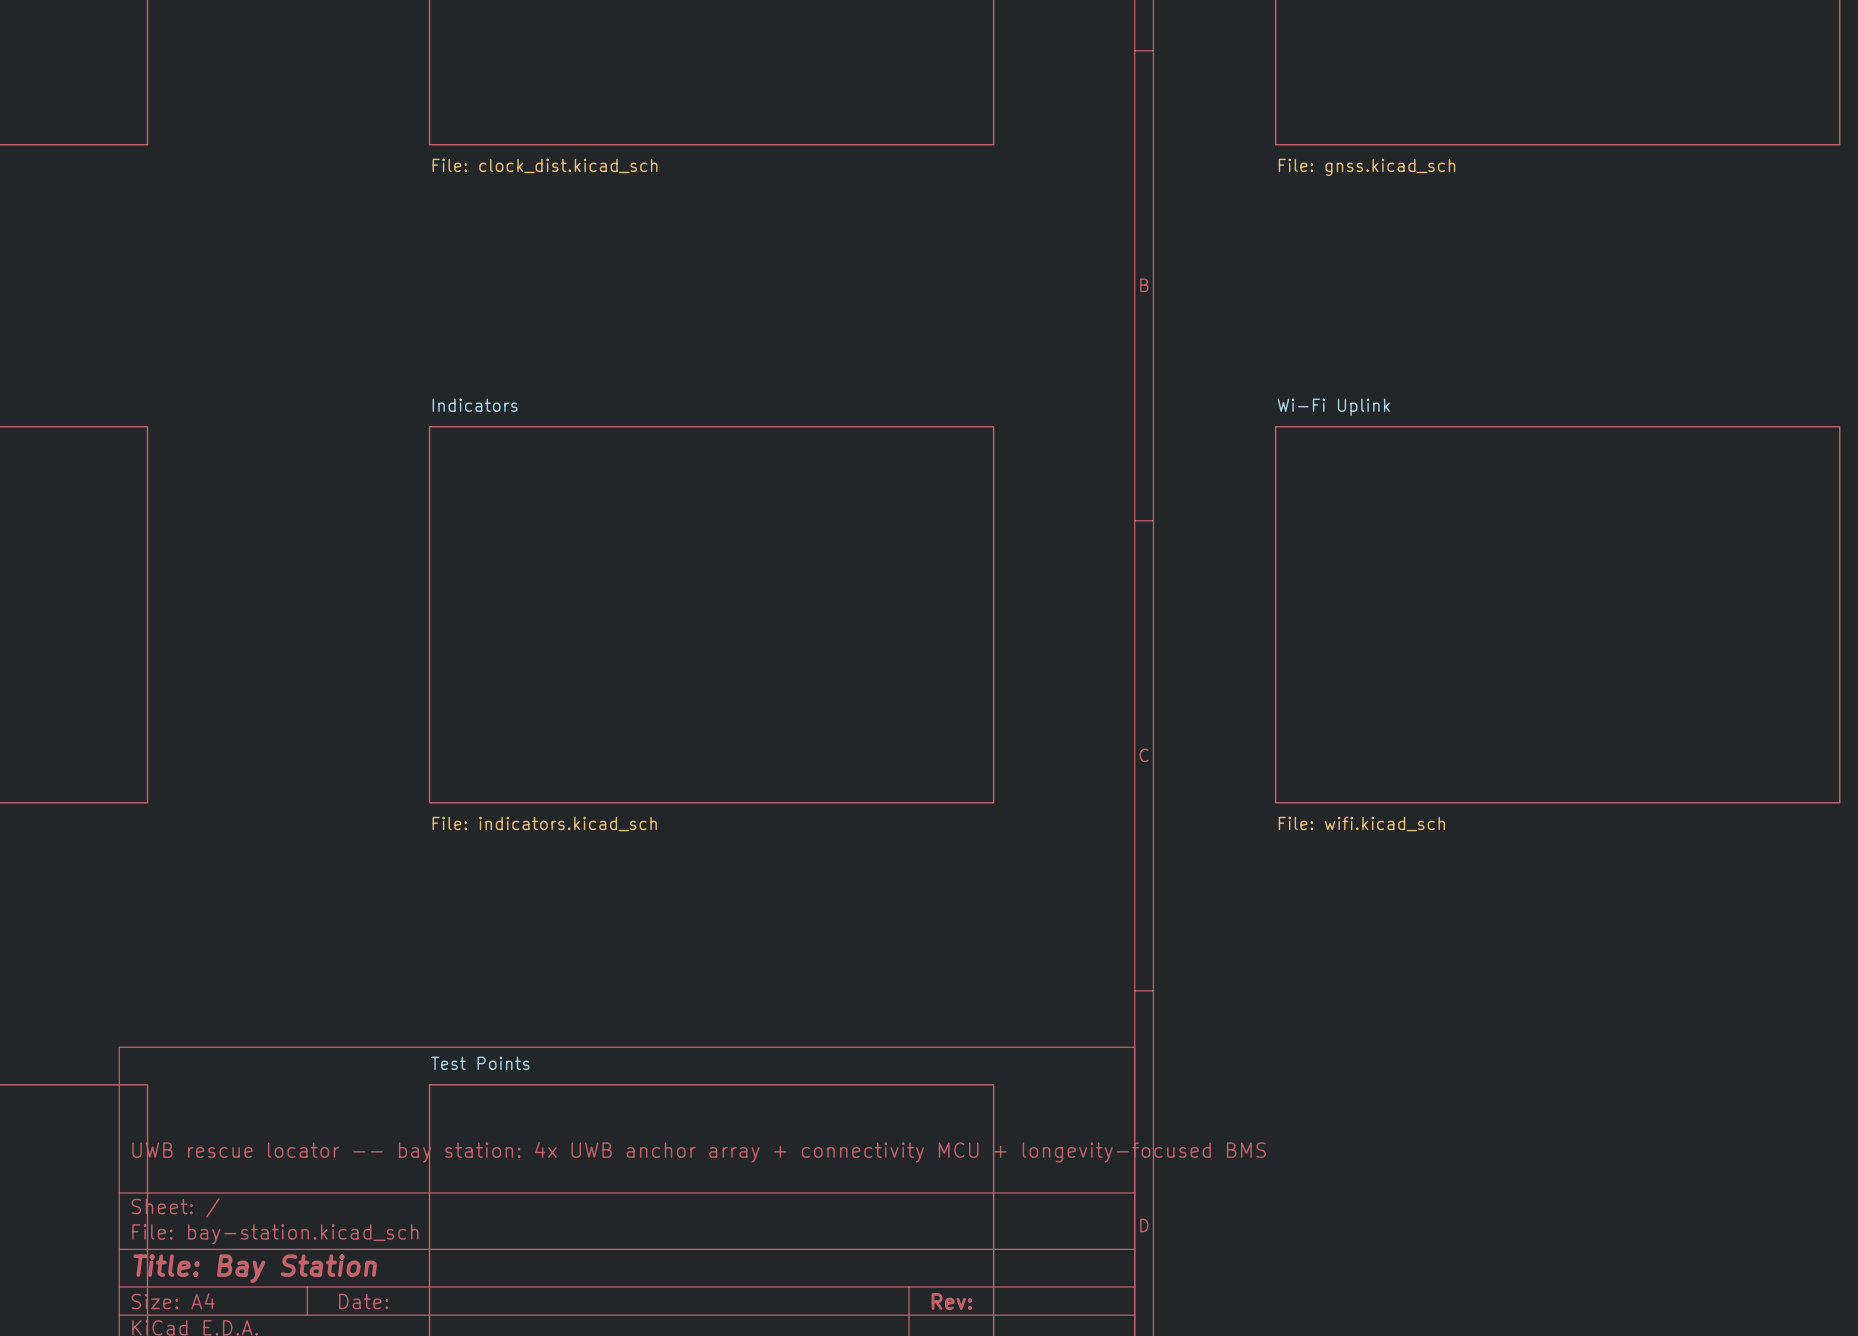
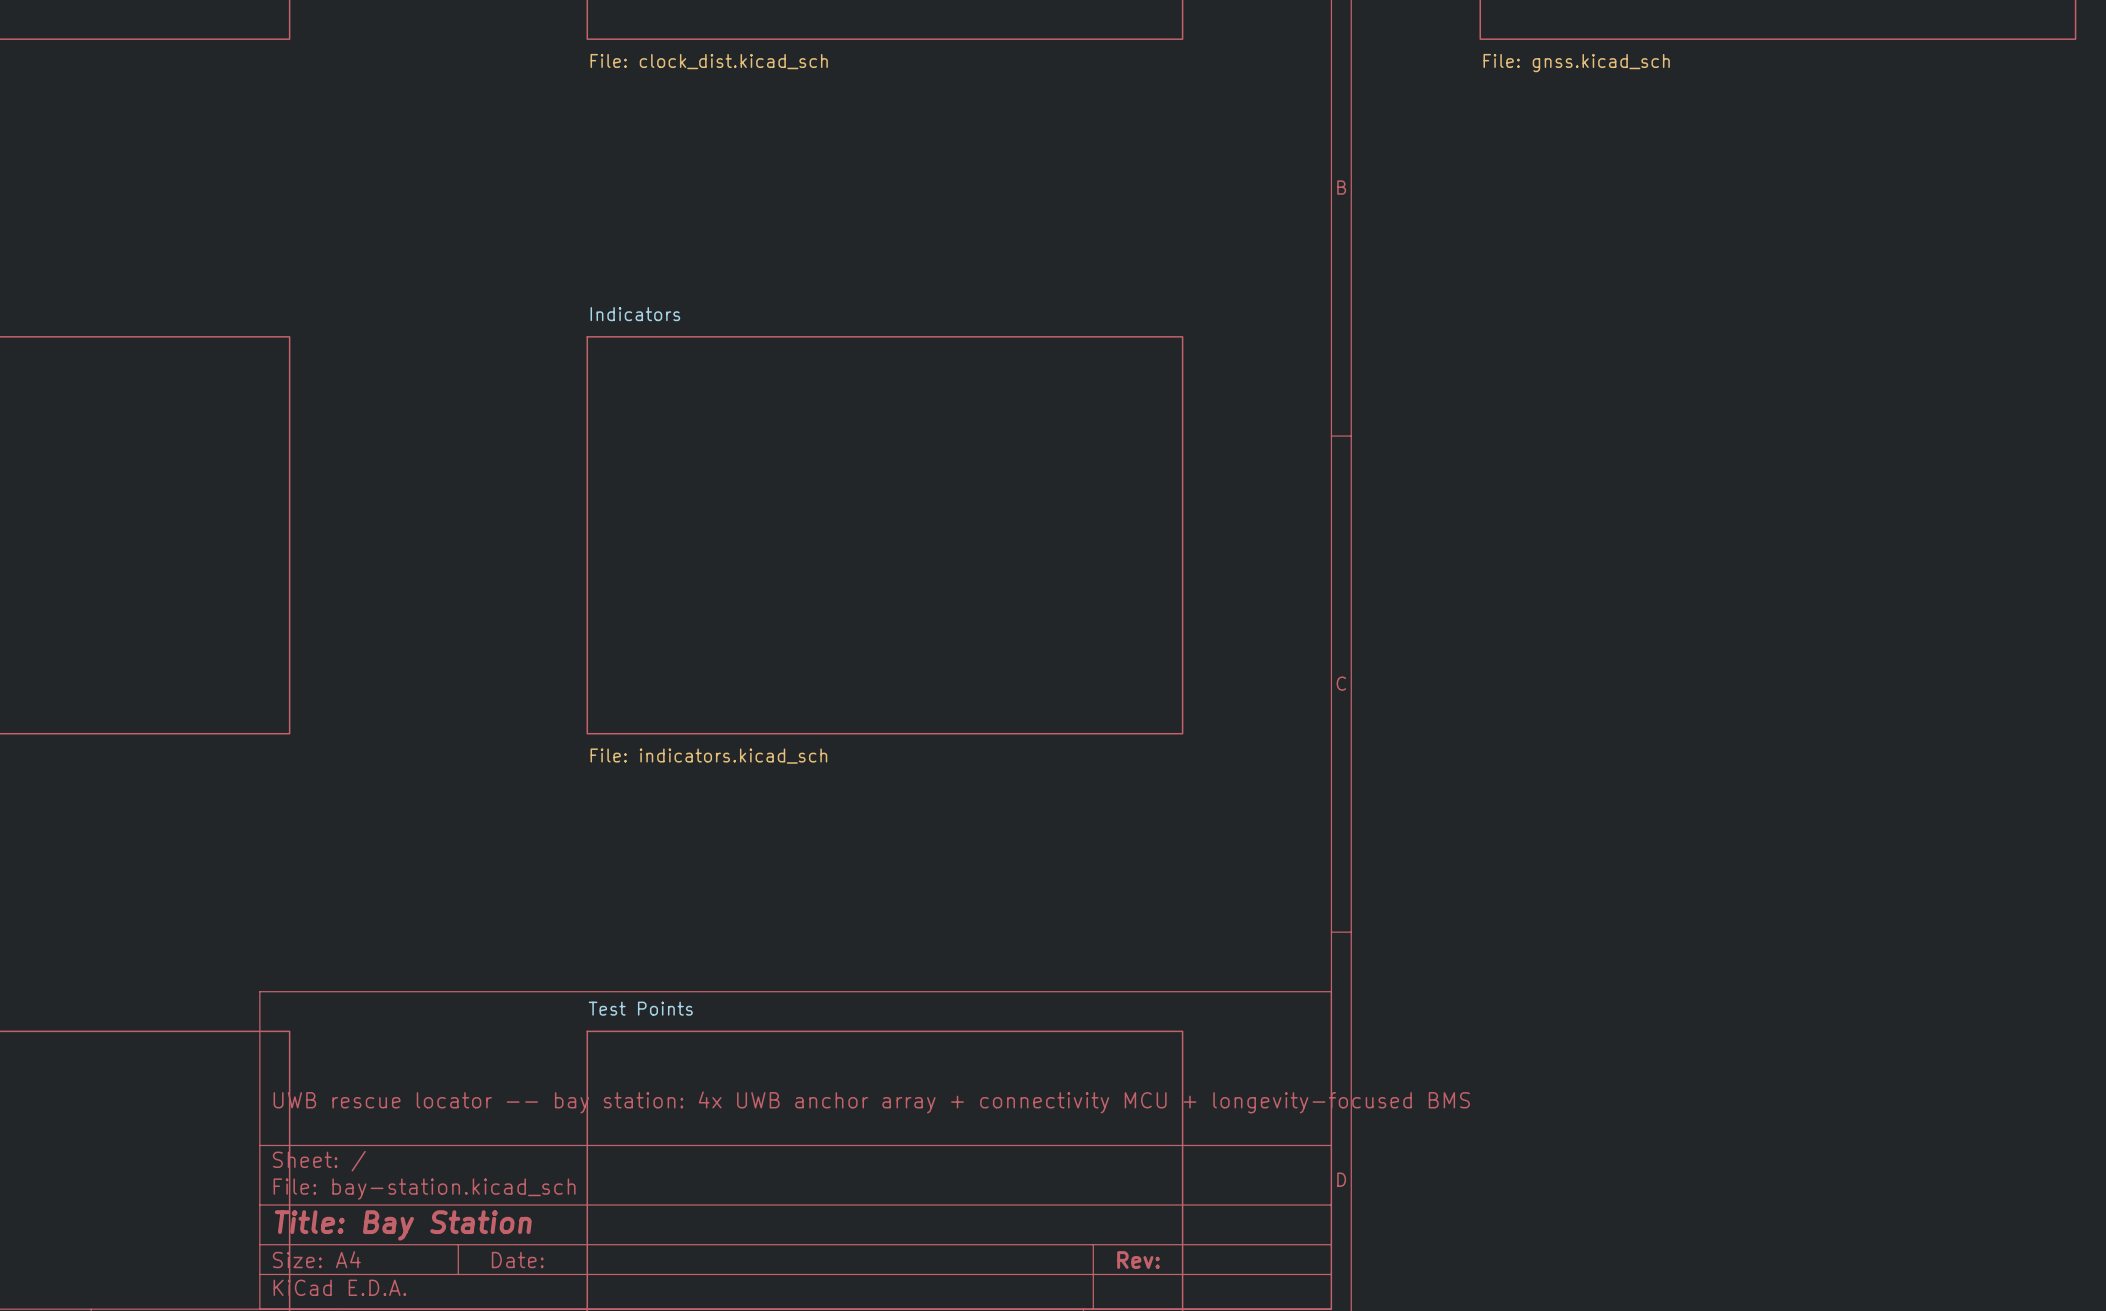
sheet Wi-Fi Uplink: File: wifi.kicad_sch (1557, 614) -> none

